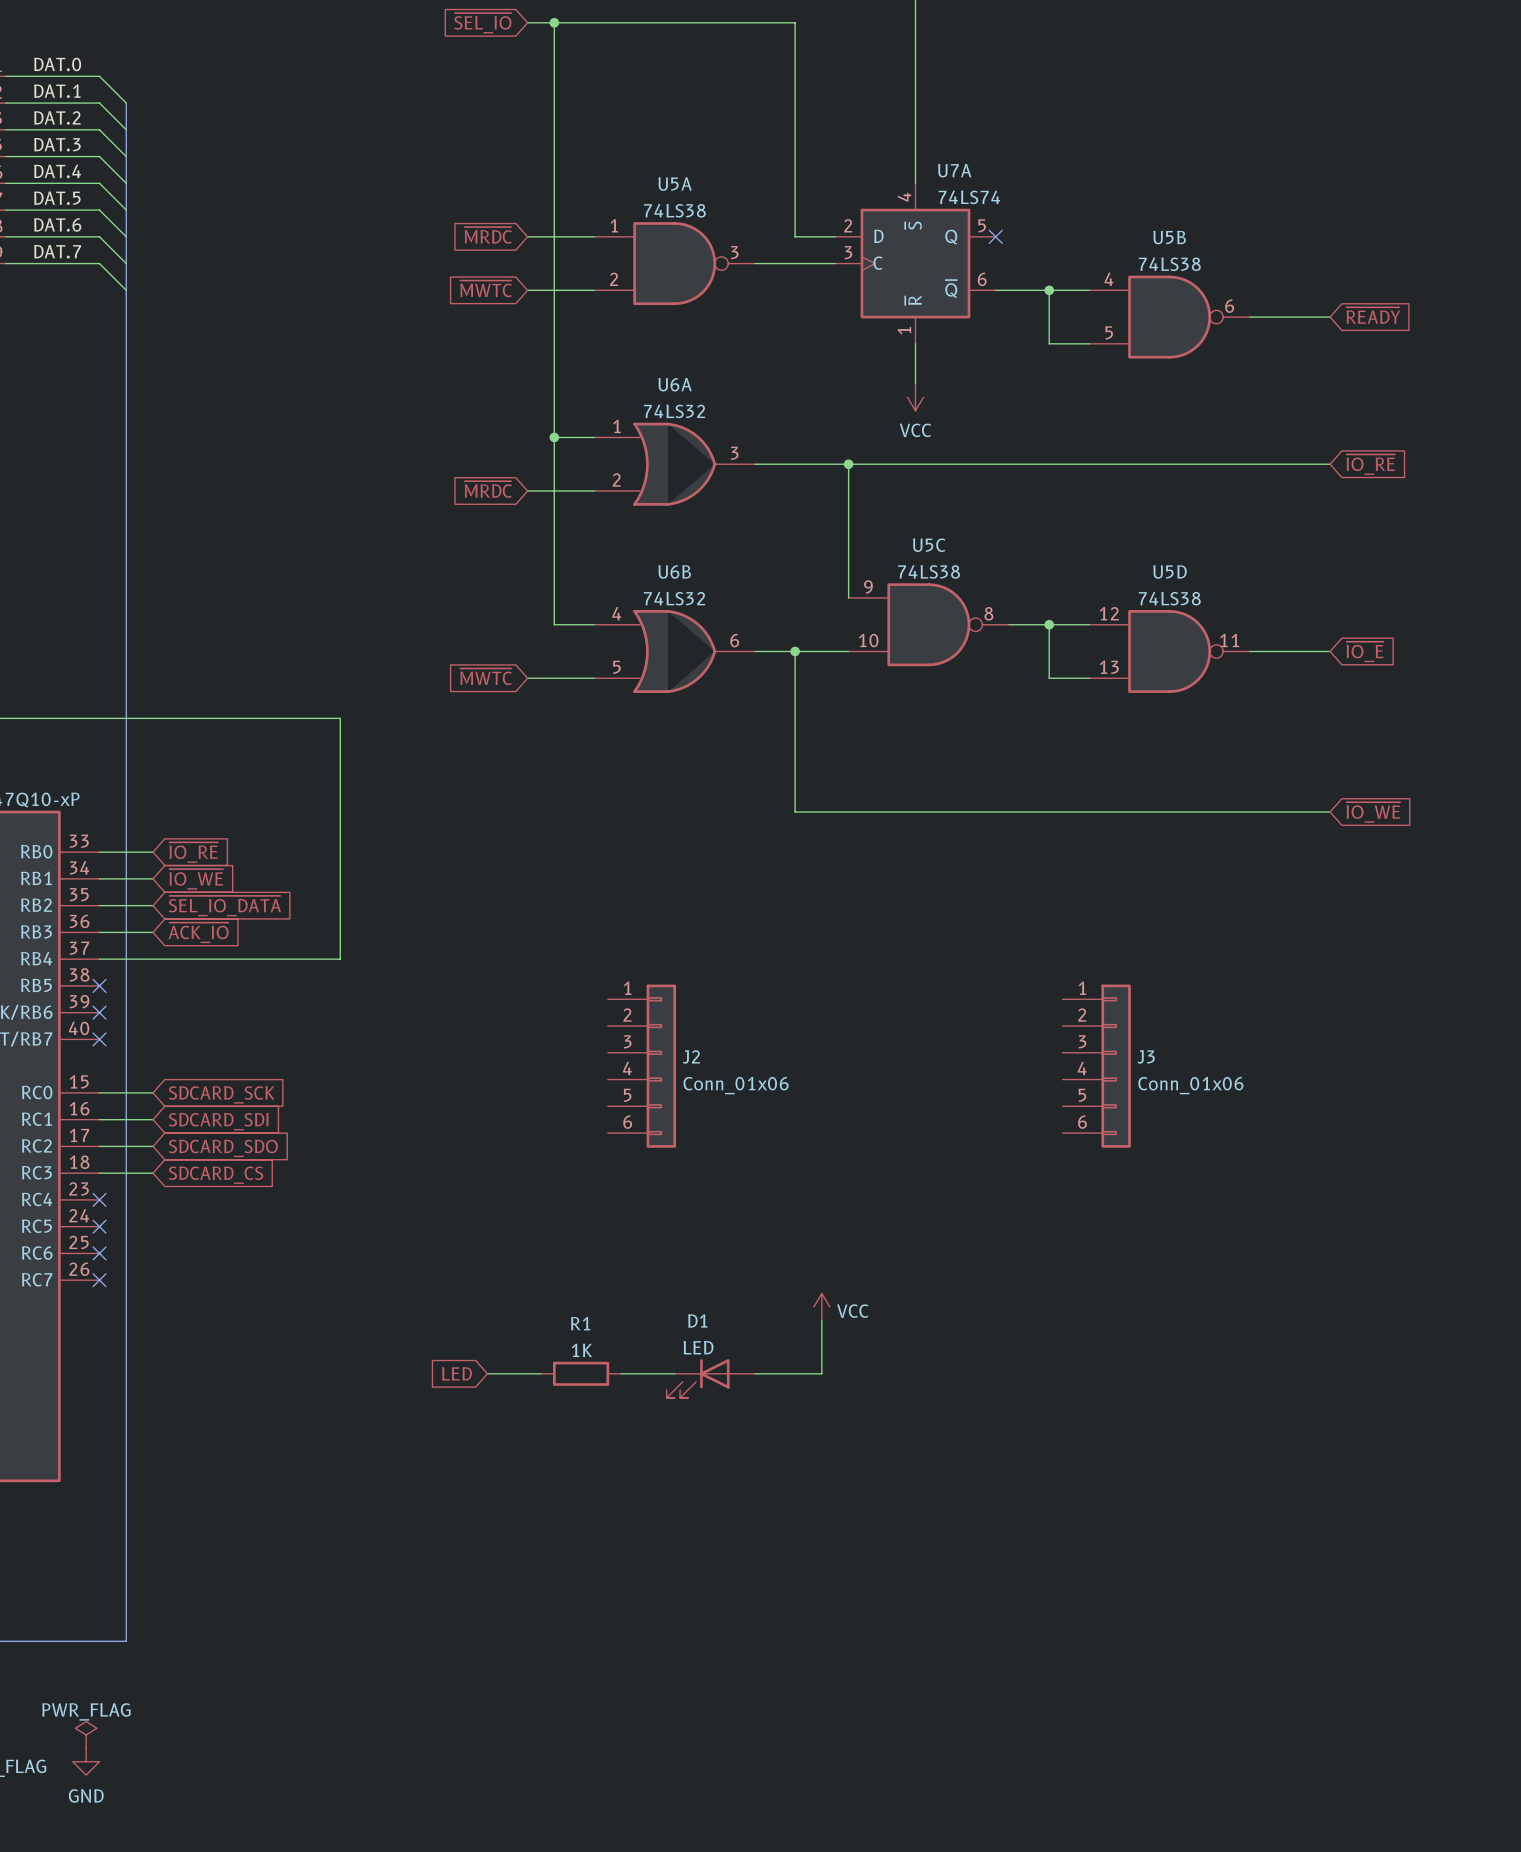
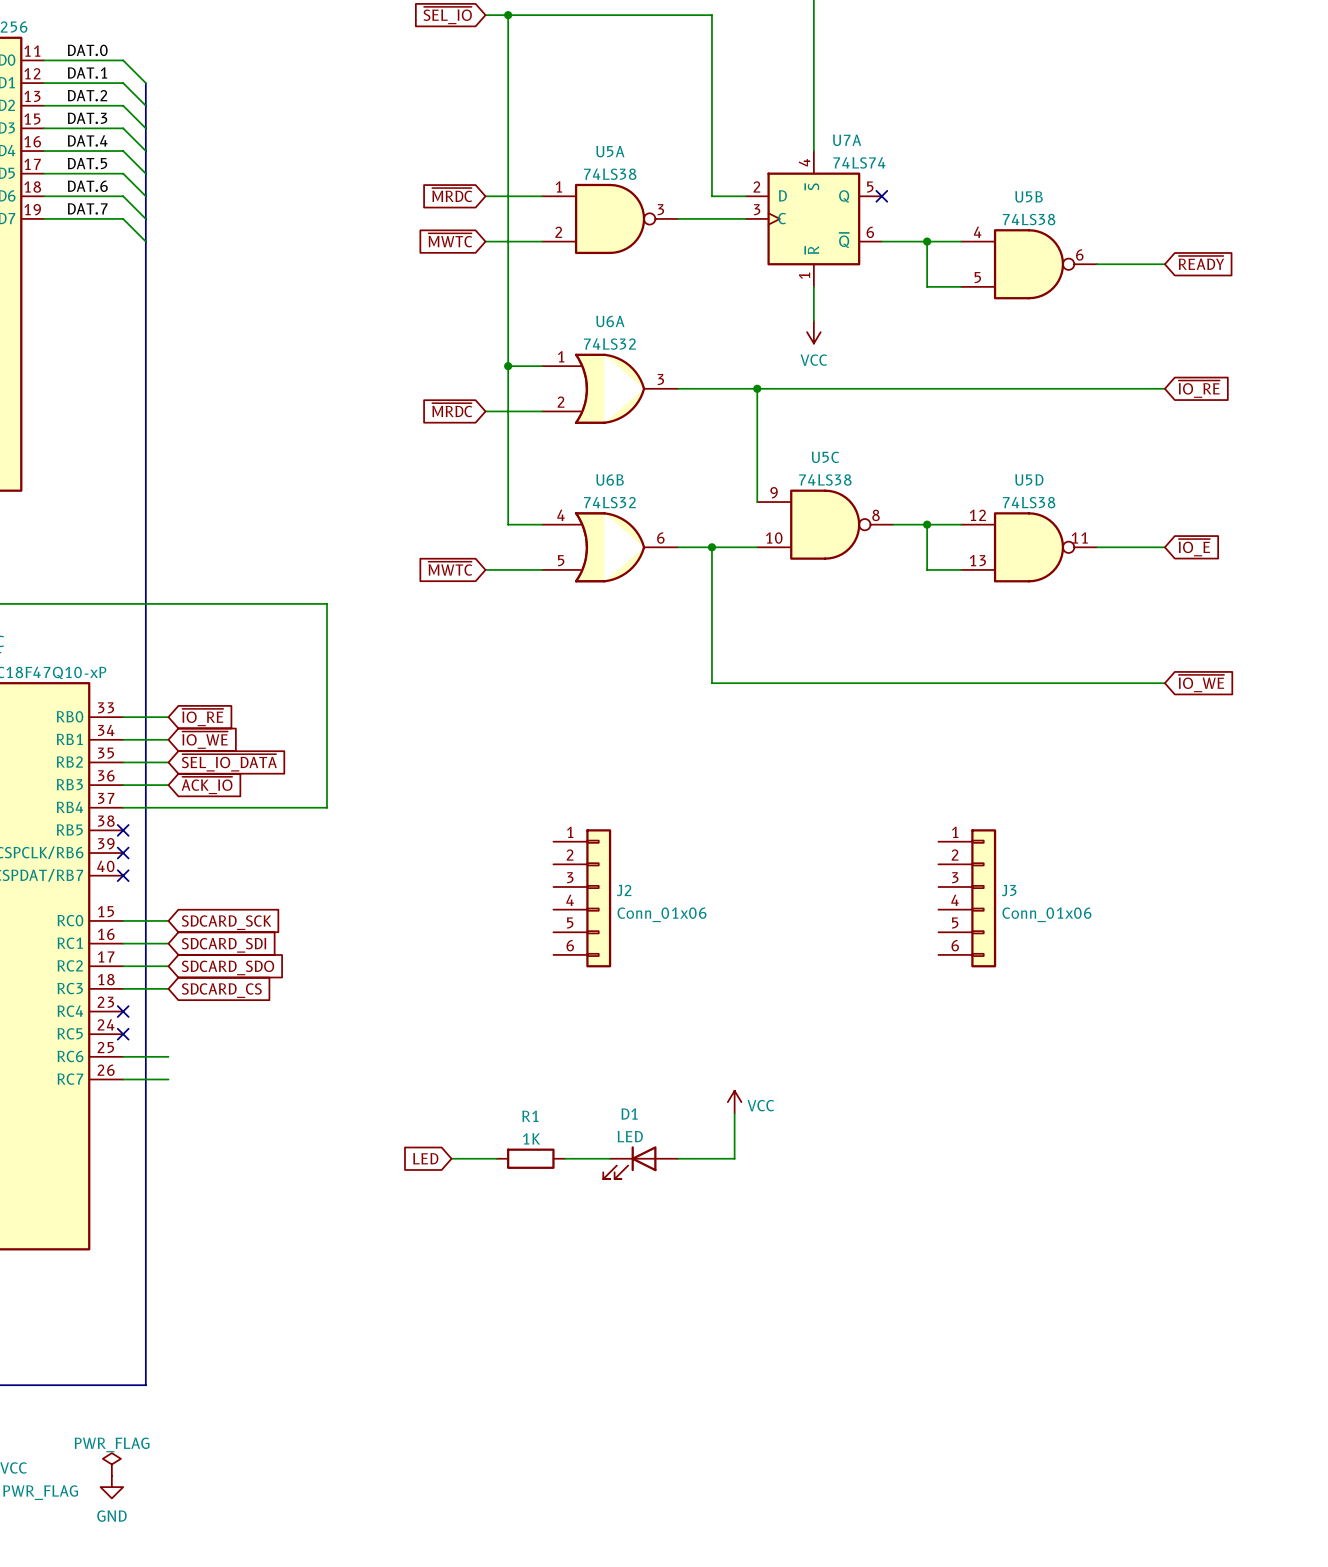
wire: none -> (123, 1056) (168, 1056)
no-connect mark: (99, 1253) -> none
wire: none -> (123, 1079) (168, 1079)
no-connect mark: (99, 1280) -> none

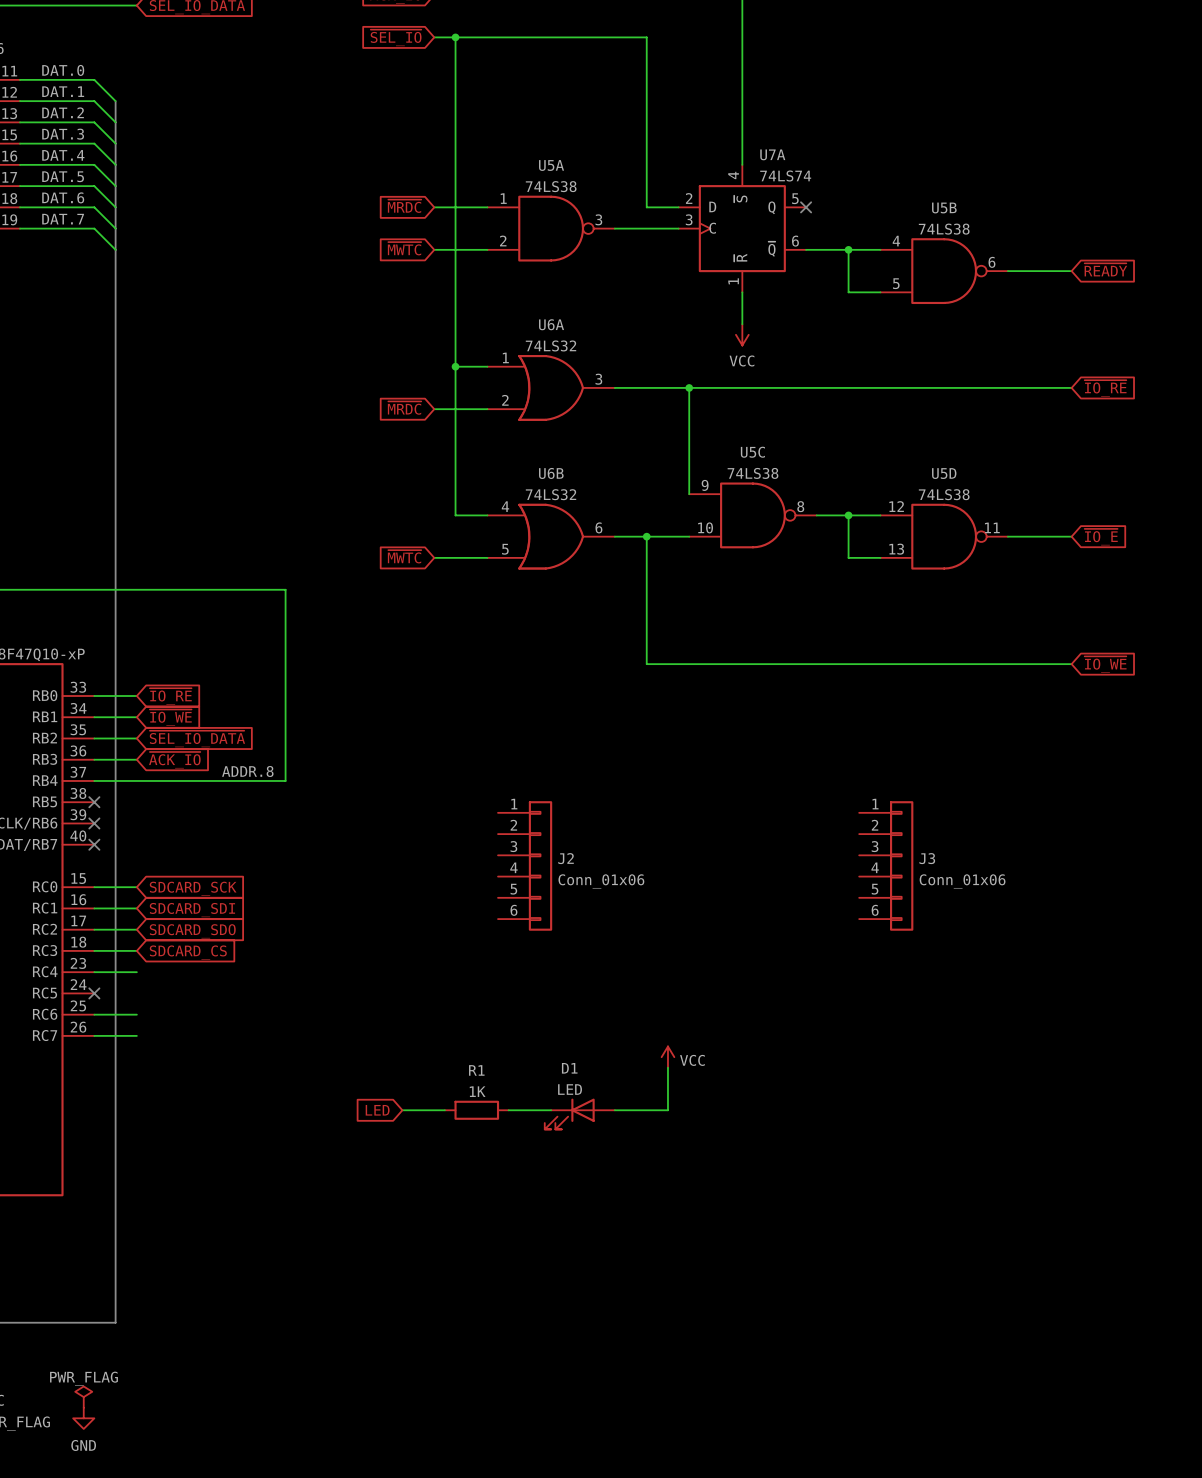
label: none -> ADDR.8 (247, 771)
wire: none -> (94, 972) (136, 972)
no-connect mark: (123, 1011) -> none

